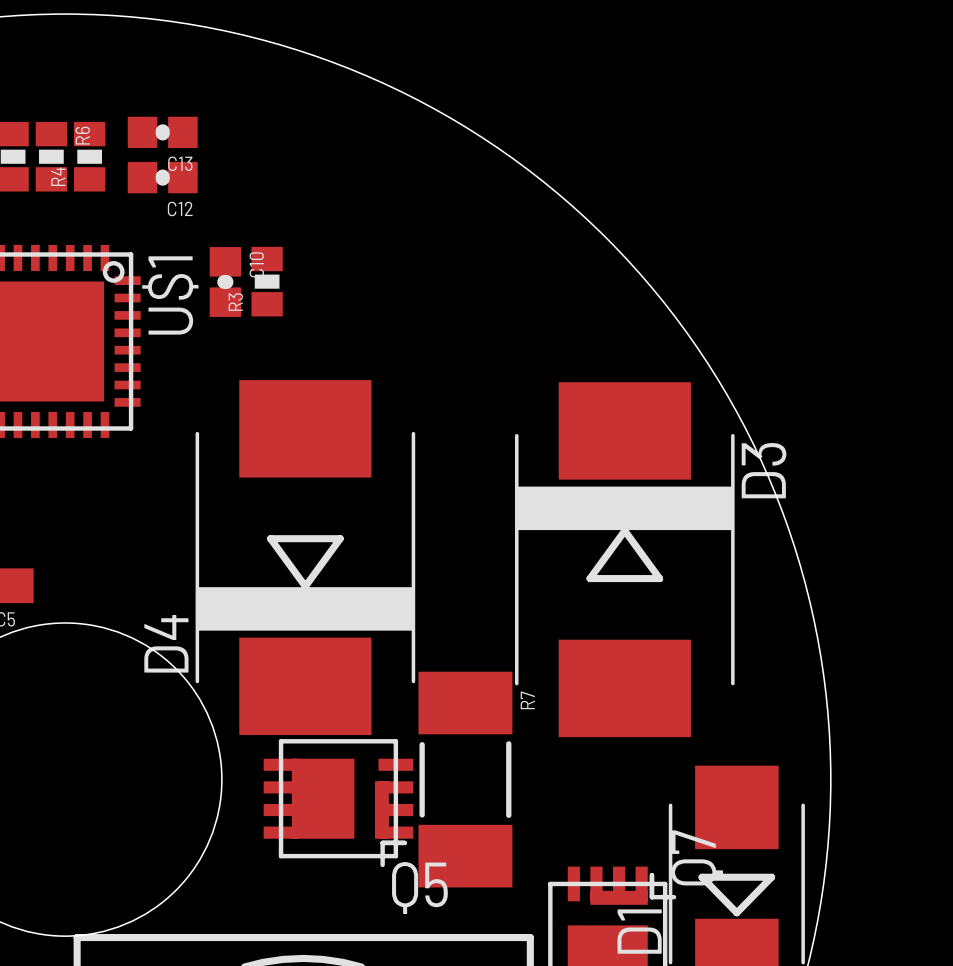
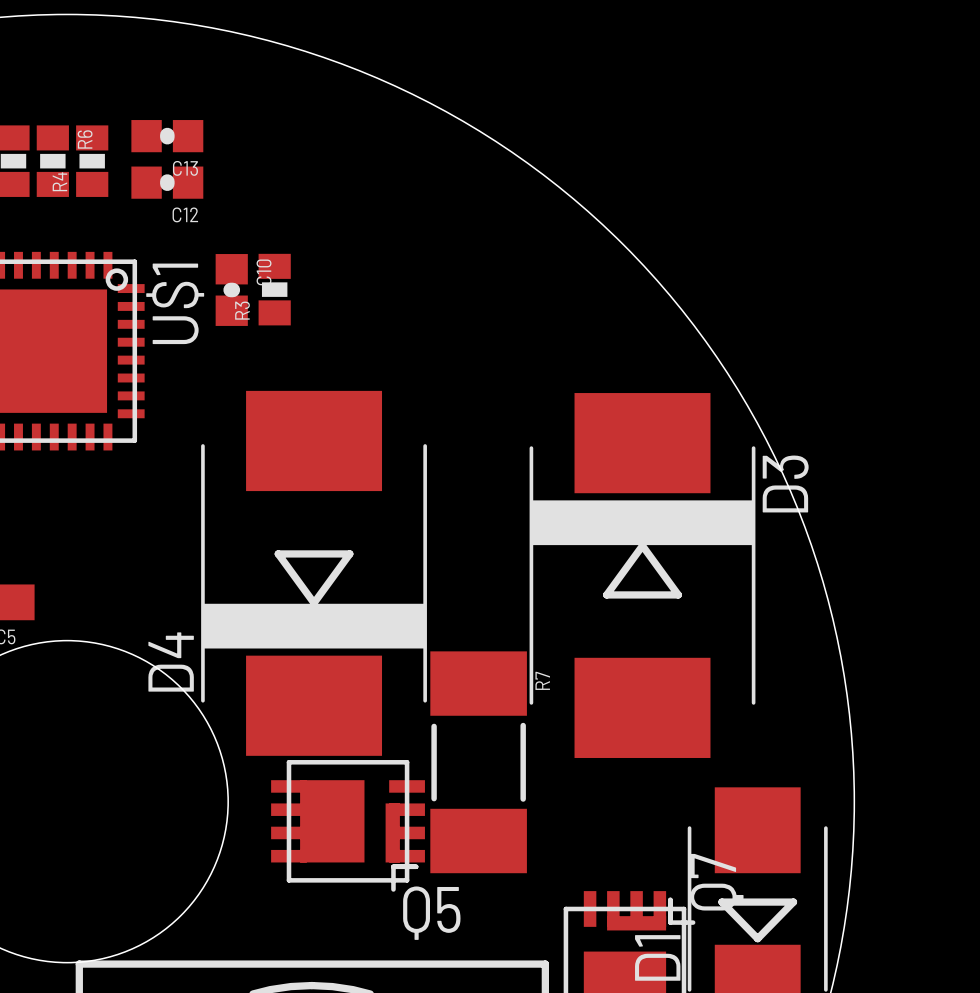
R7 position: (465, 779) -> (478, 762)

